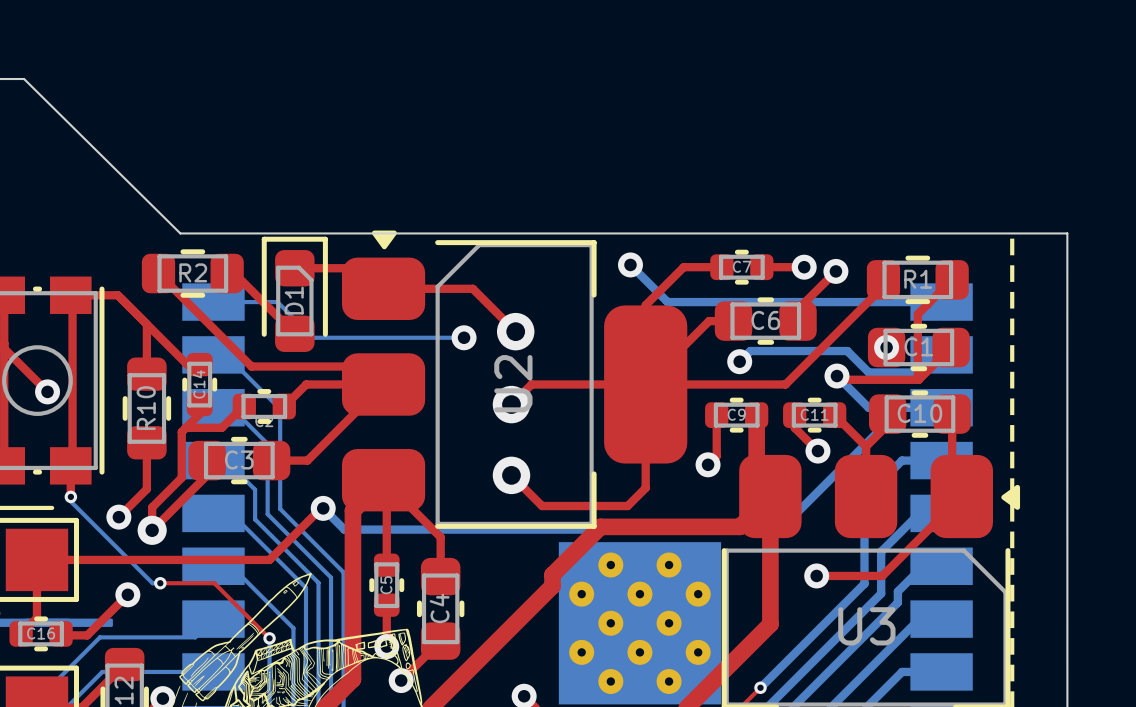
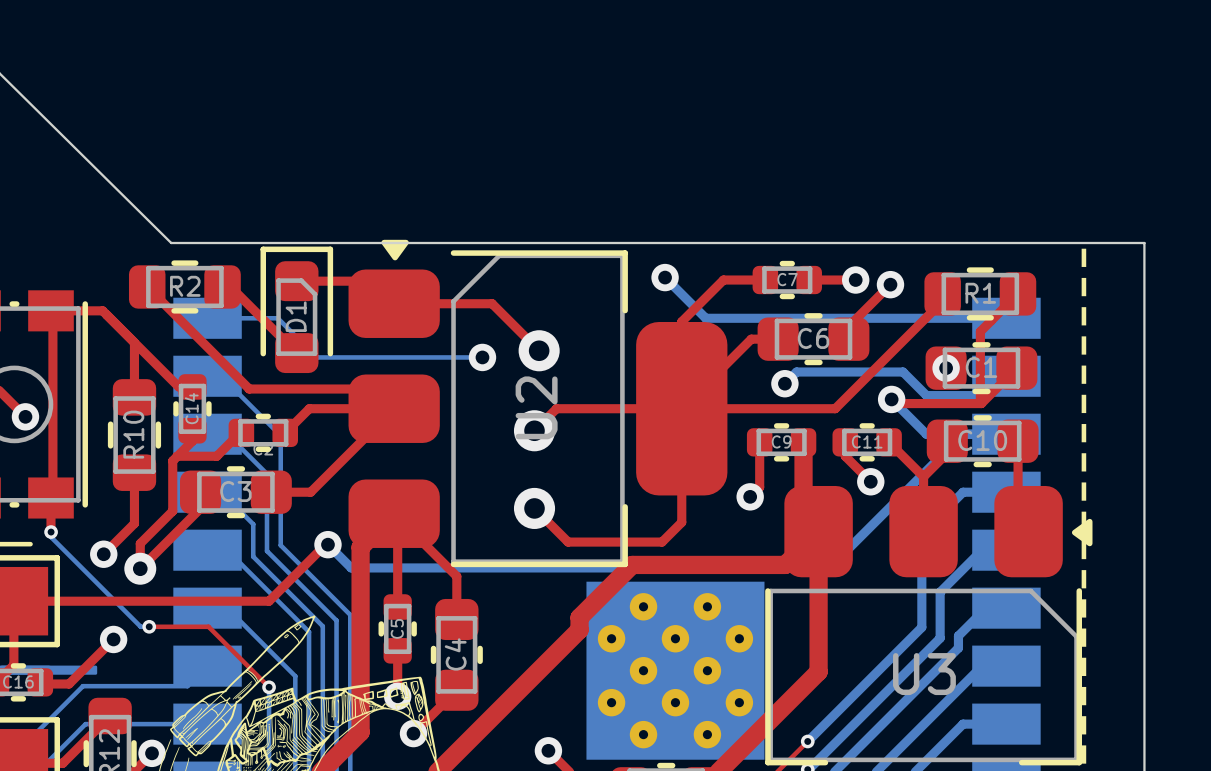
top track: (961, 496) (882, 575) (816, 575) -> none
via: (816, 575) -> none

